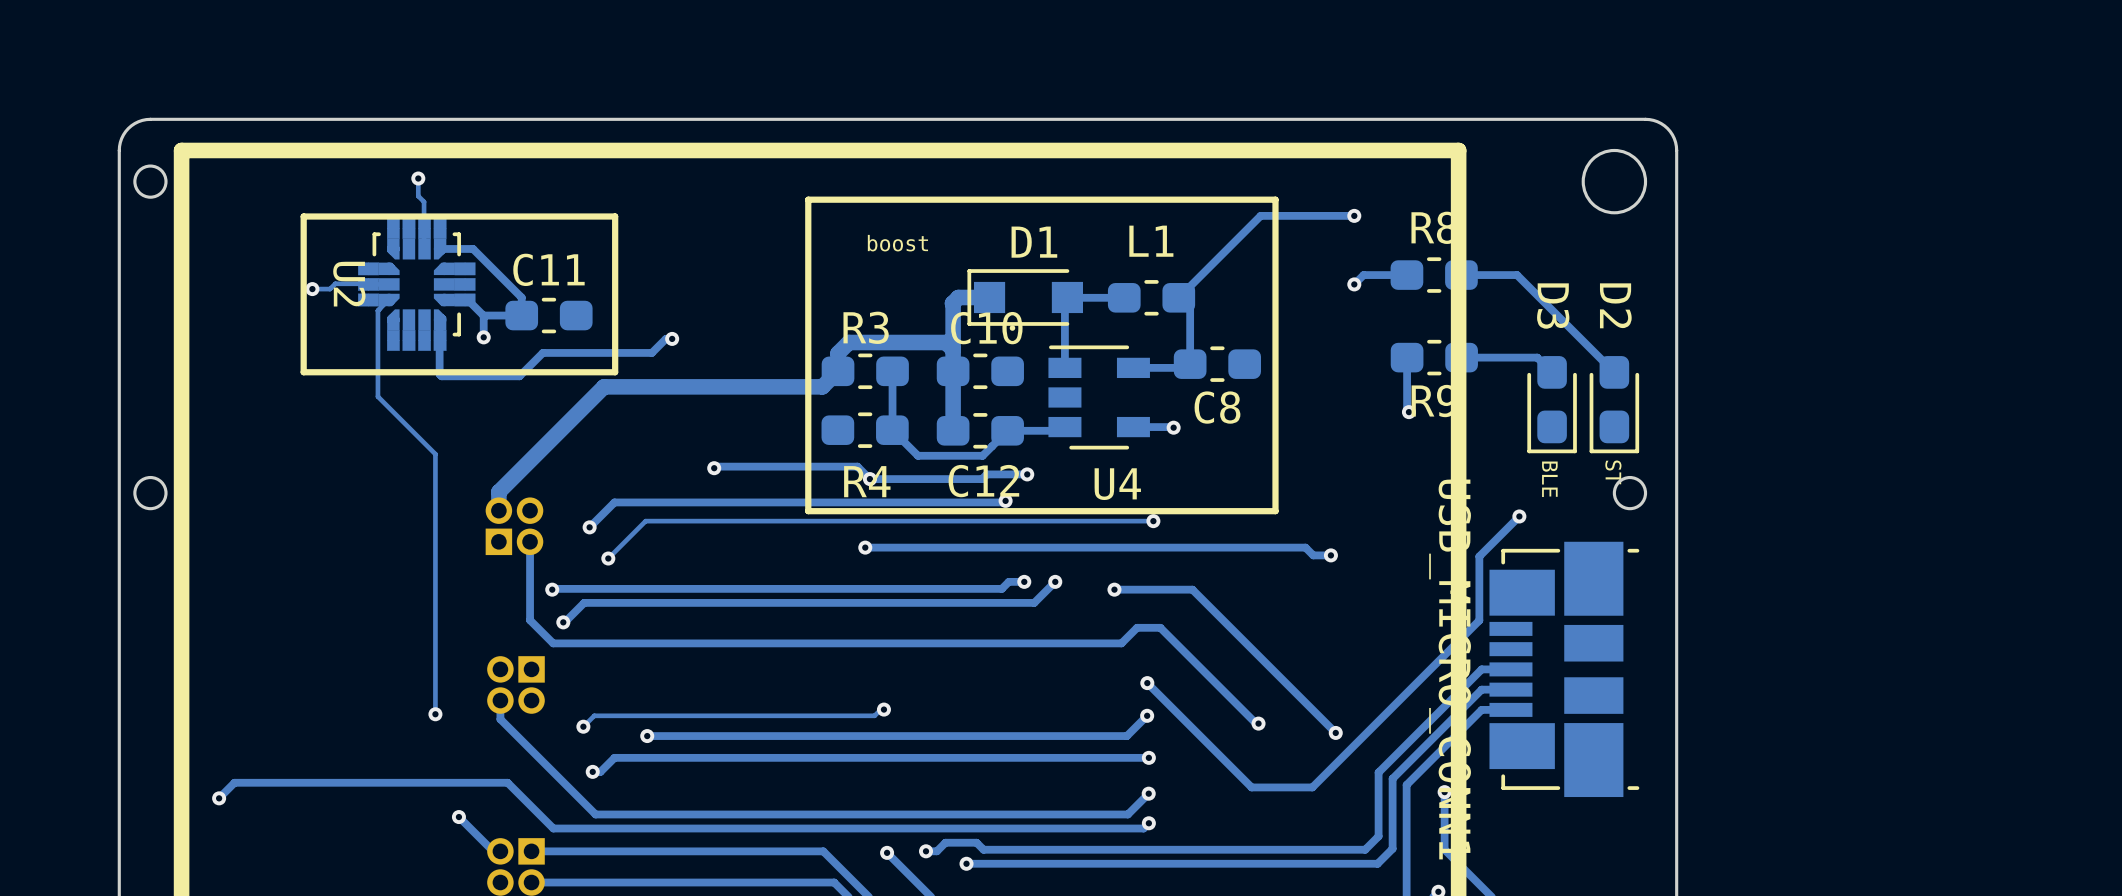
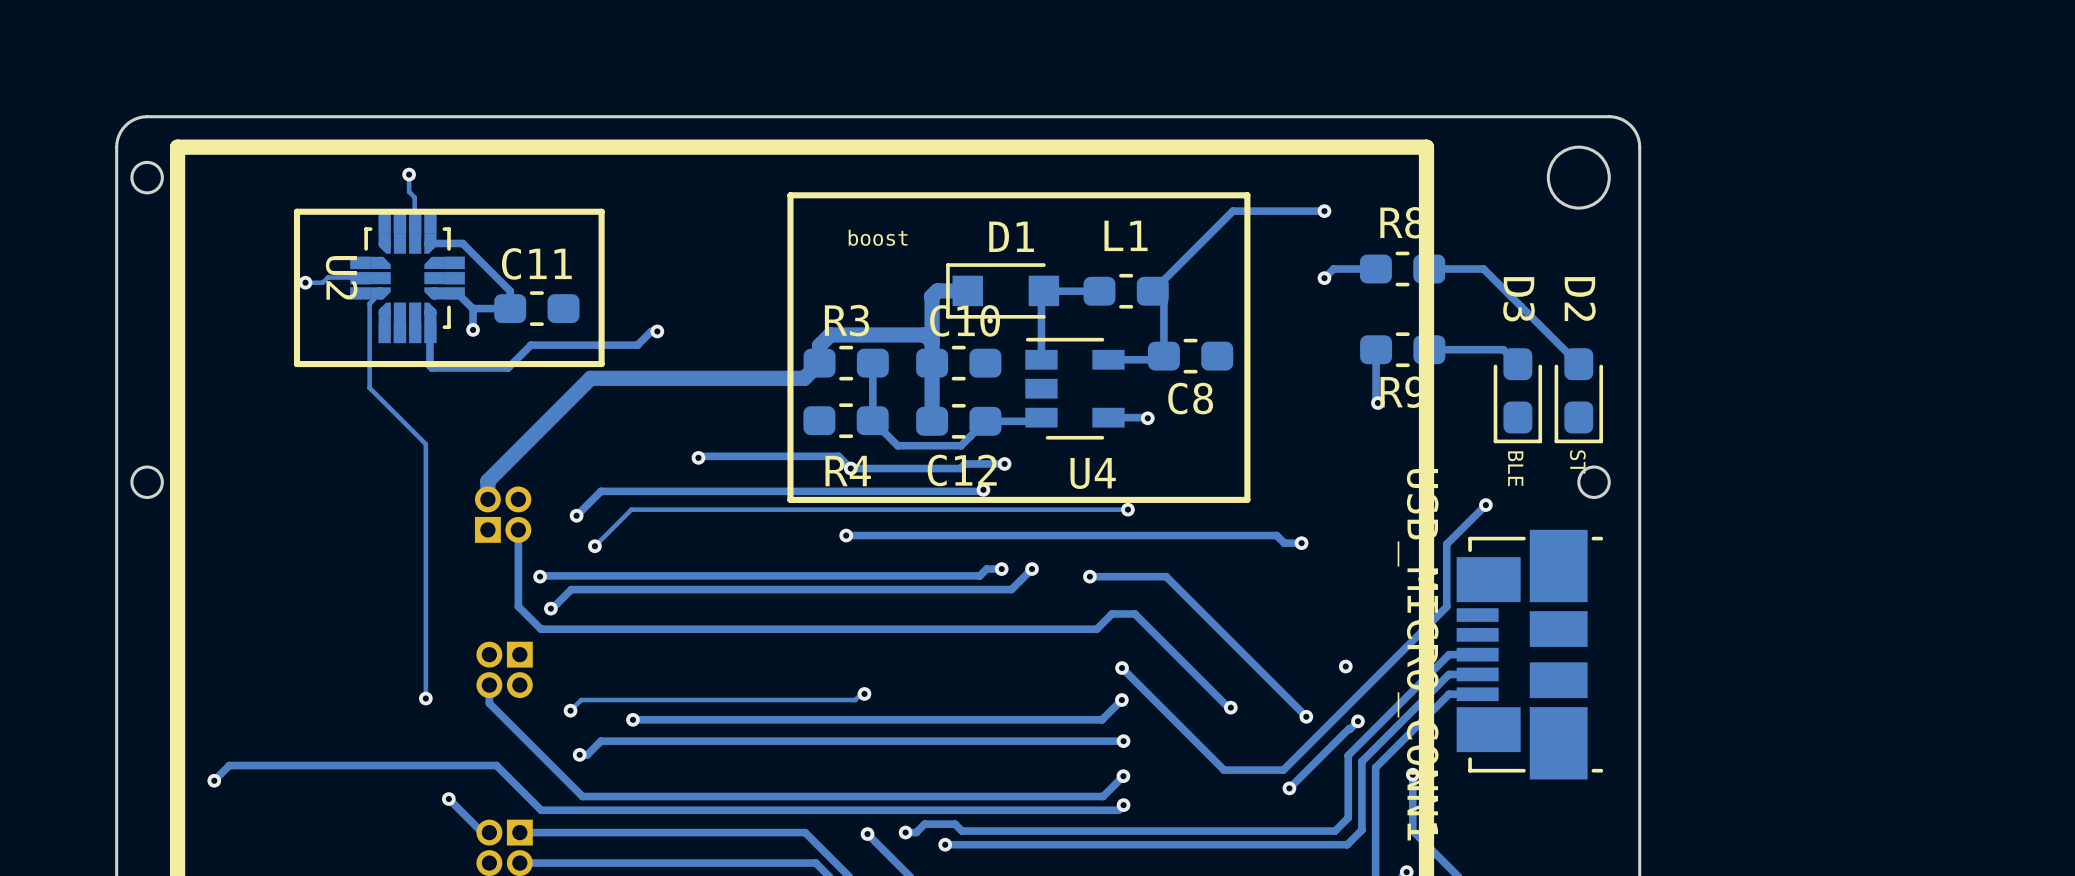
via: none -> (1345, 666)
track: none -> (1357, 721) (1289, 788)
via: none -> (1357, 721)
via: none -> (1289, 788)

